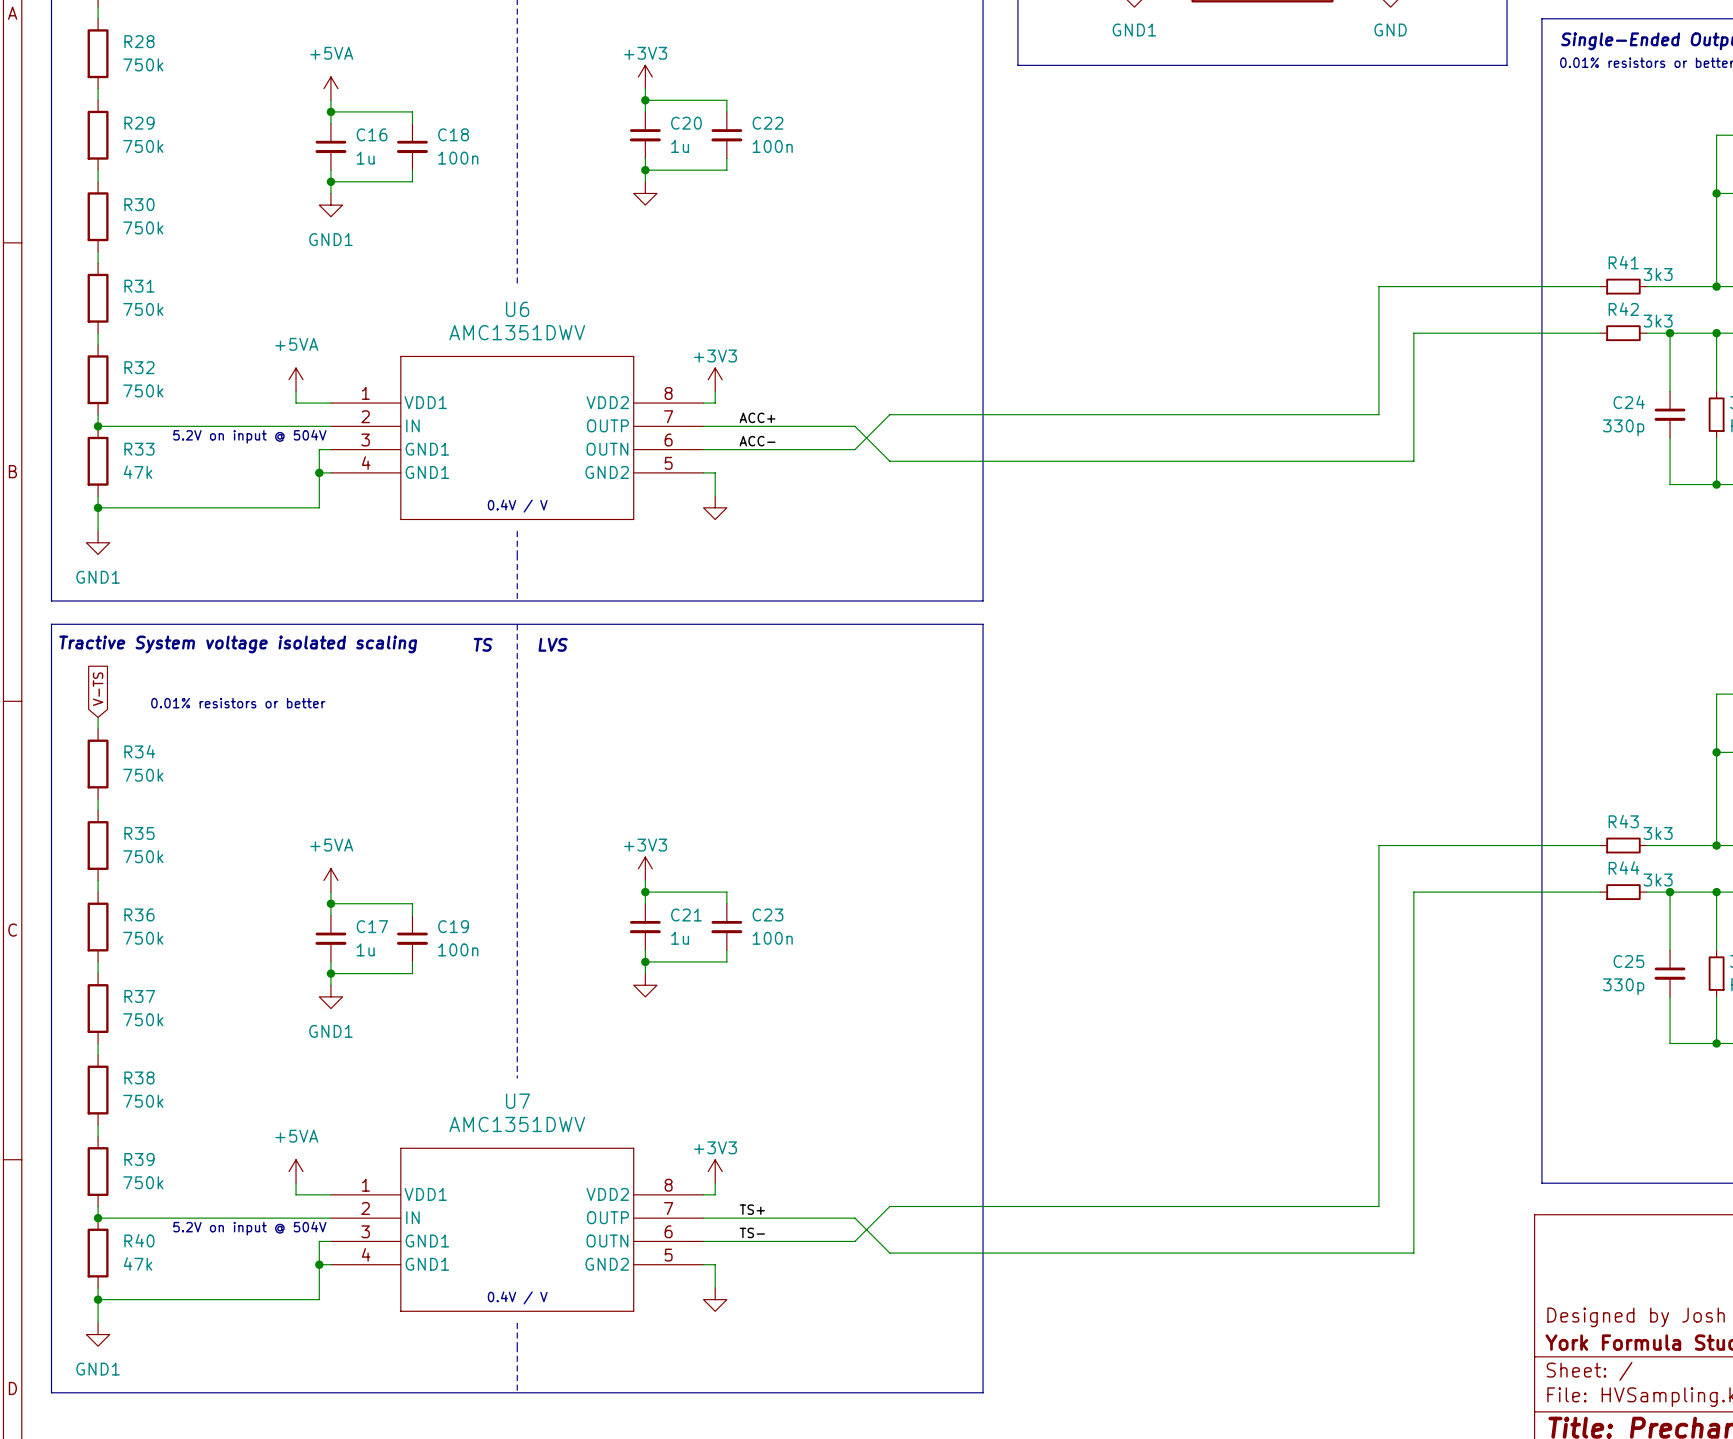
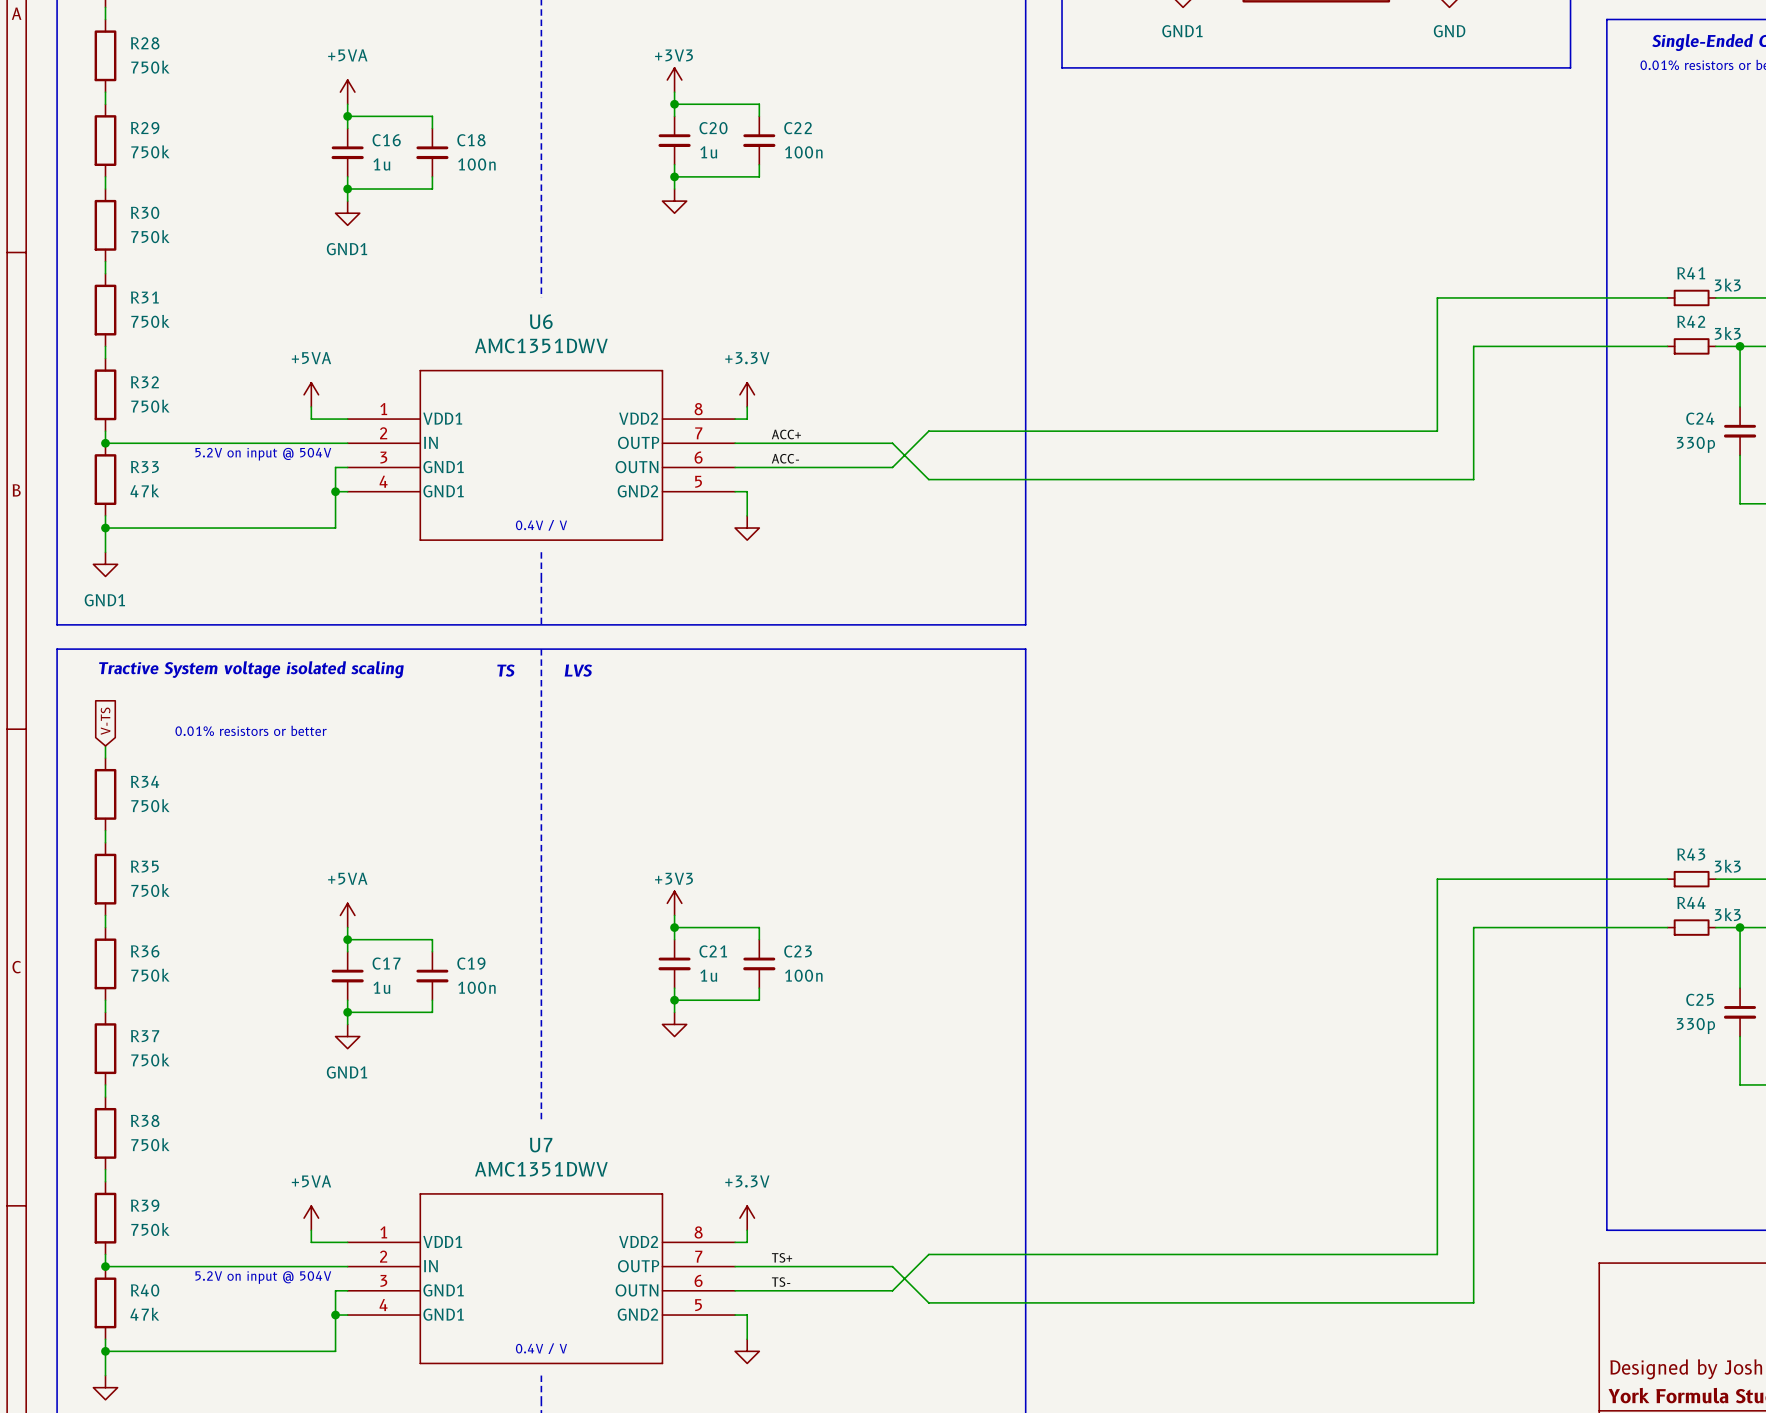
power symbol: +3V3 (715, 379) -> +3.3V (747, 394)
power symbol: +3V3 (715, 1171) -> +3.3V (747, 1218)

